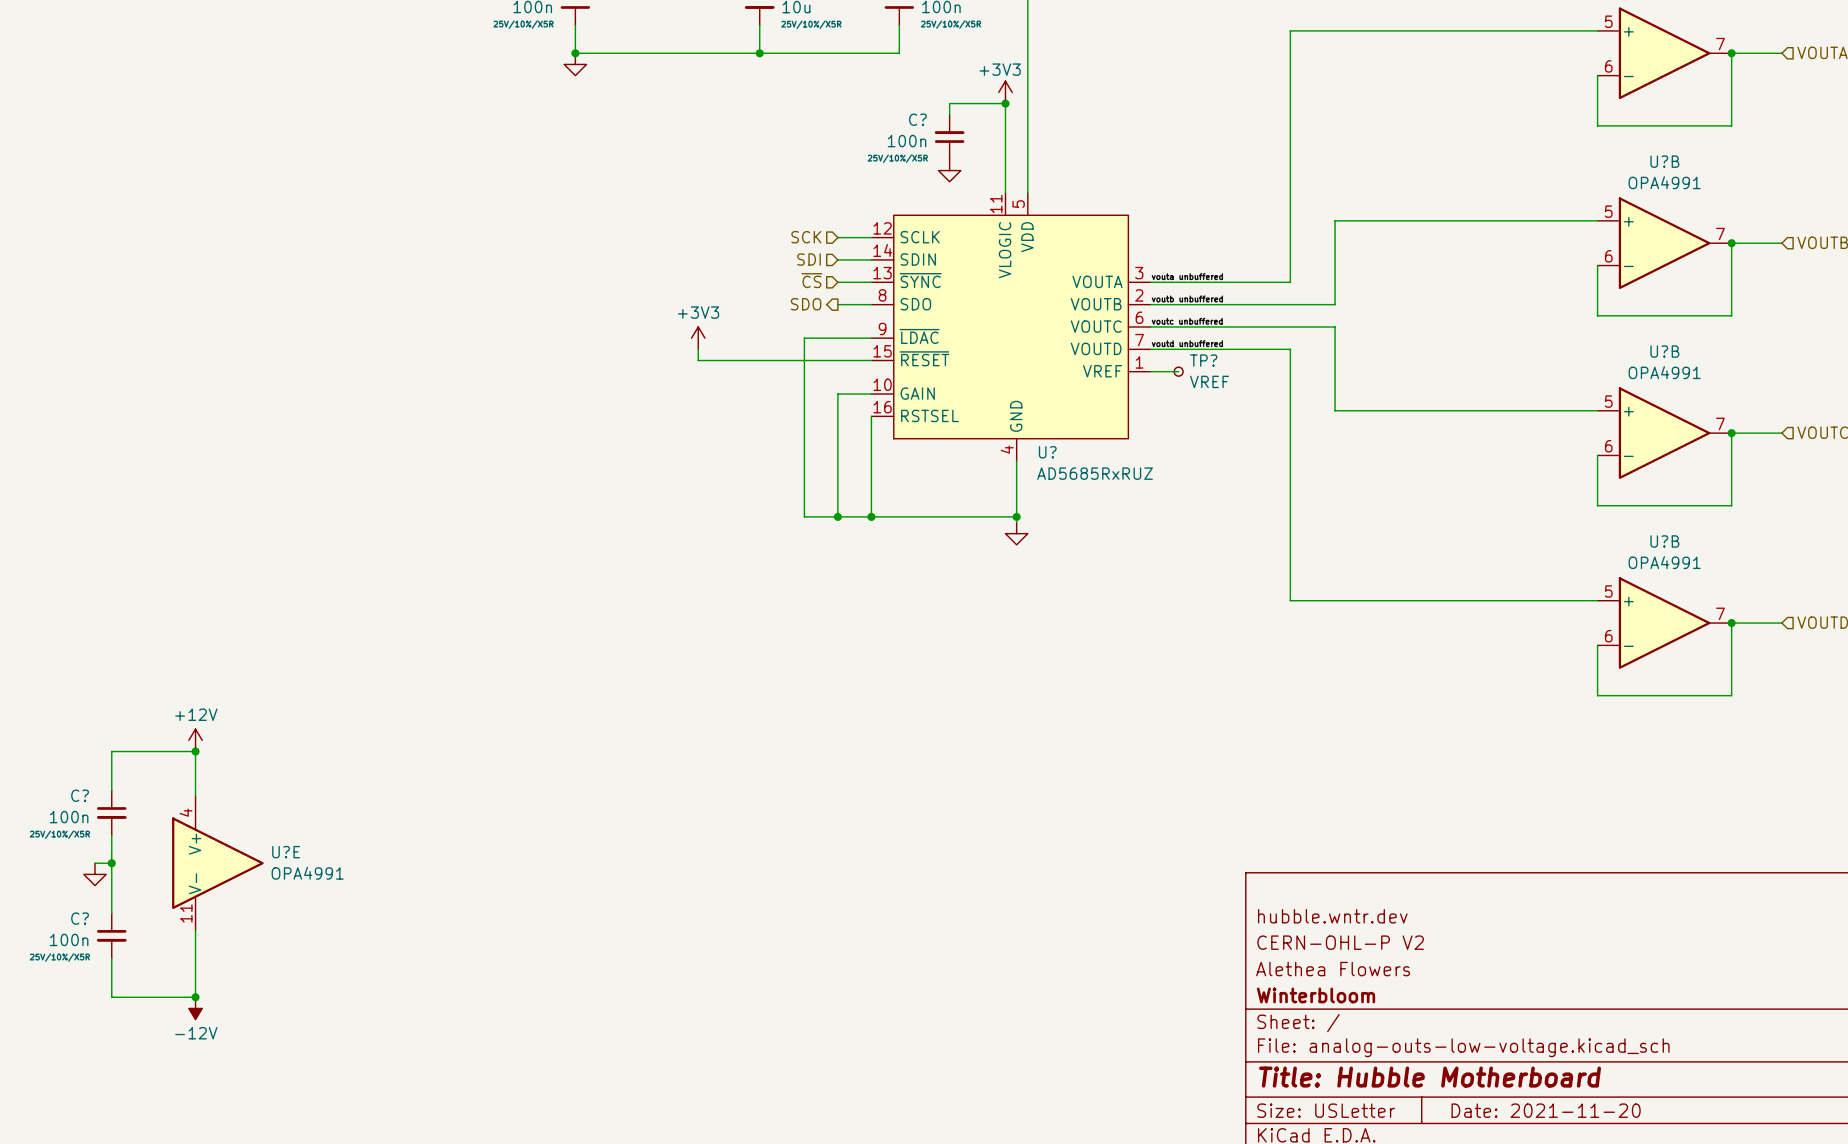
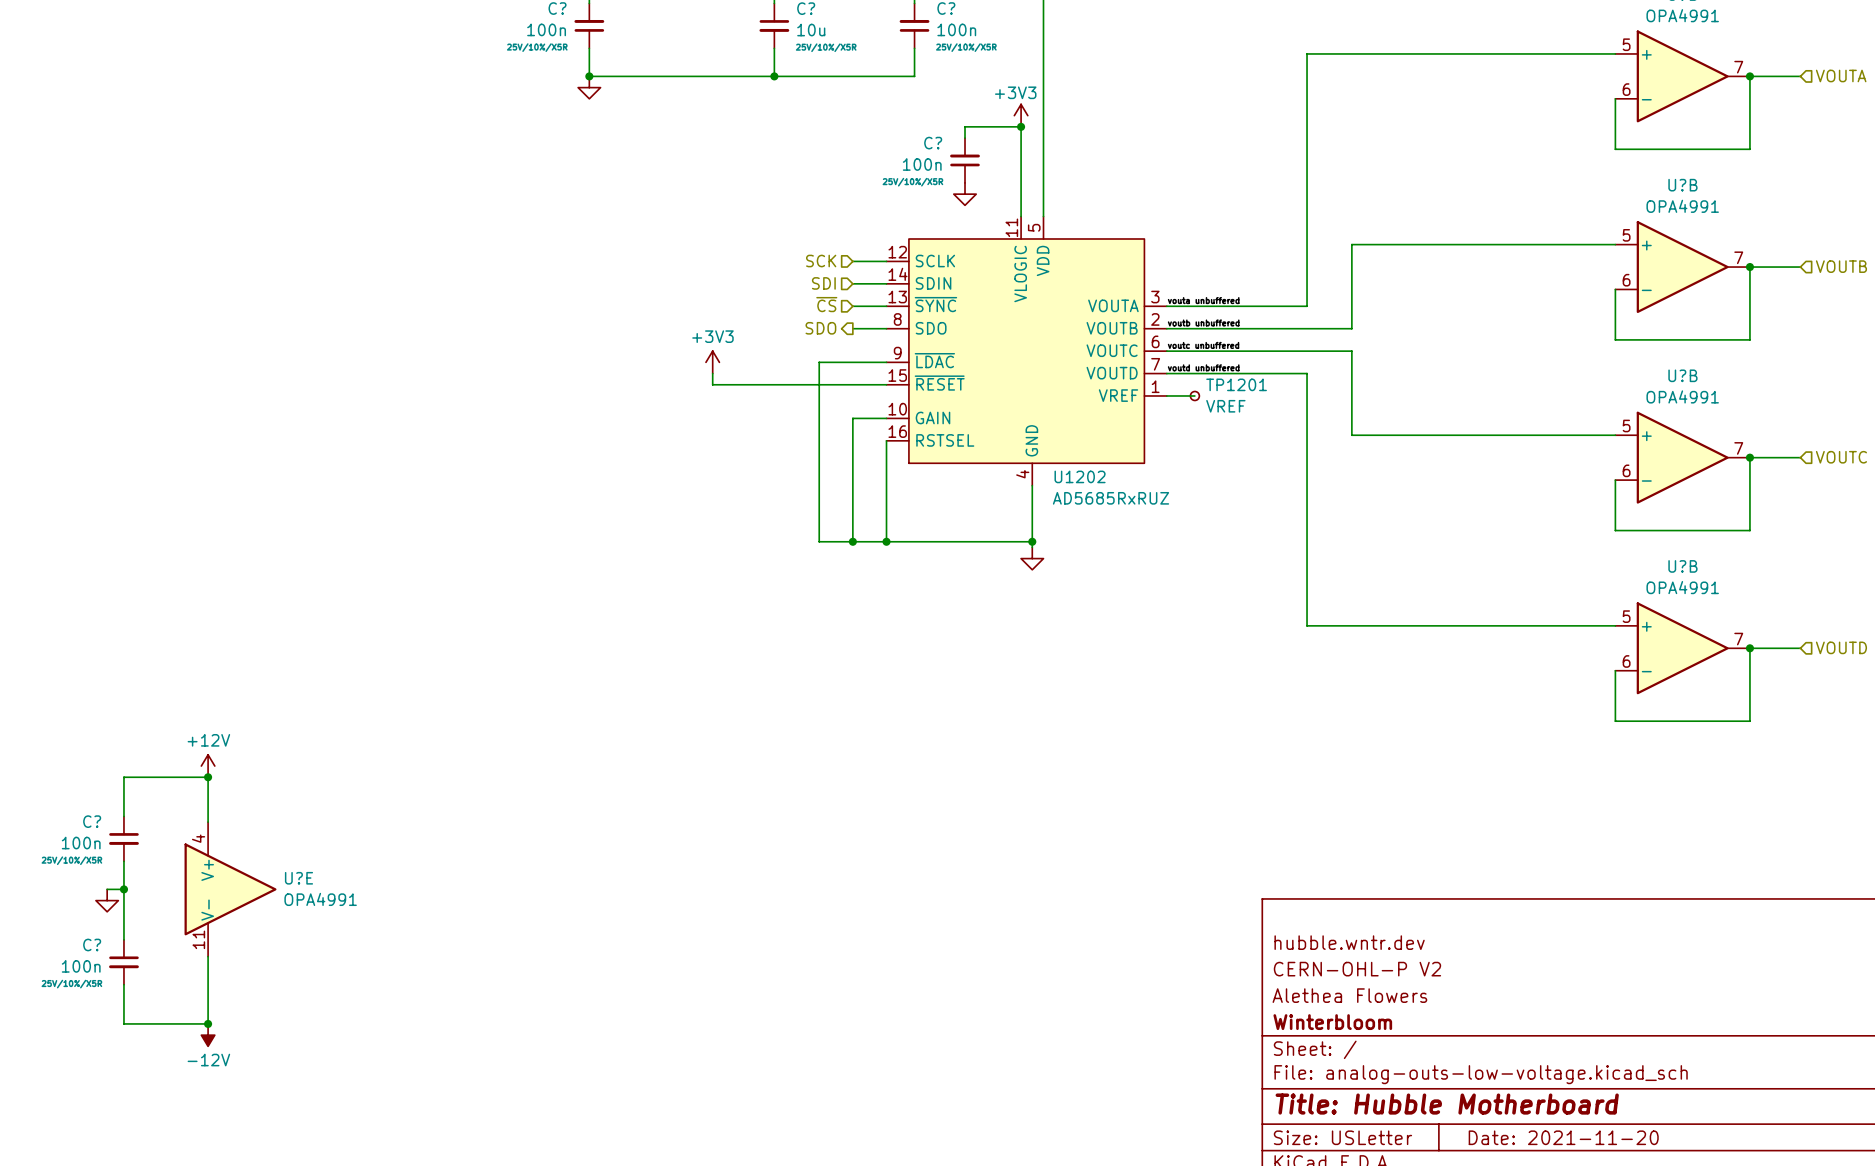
TP? name: TP? (1203, 360) -> TP1201 (1236, 384)
U? name: U? (1047, 452) -> U1202 (1080, 476)

